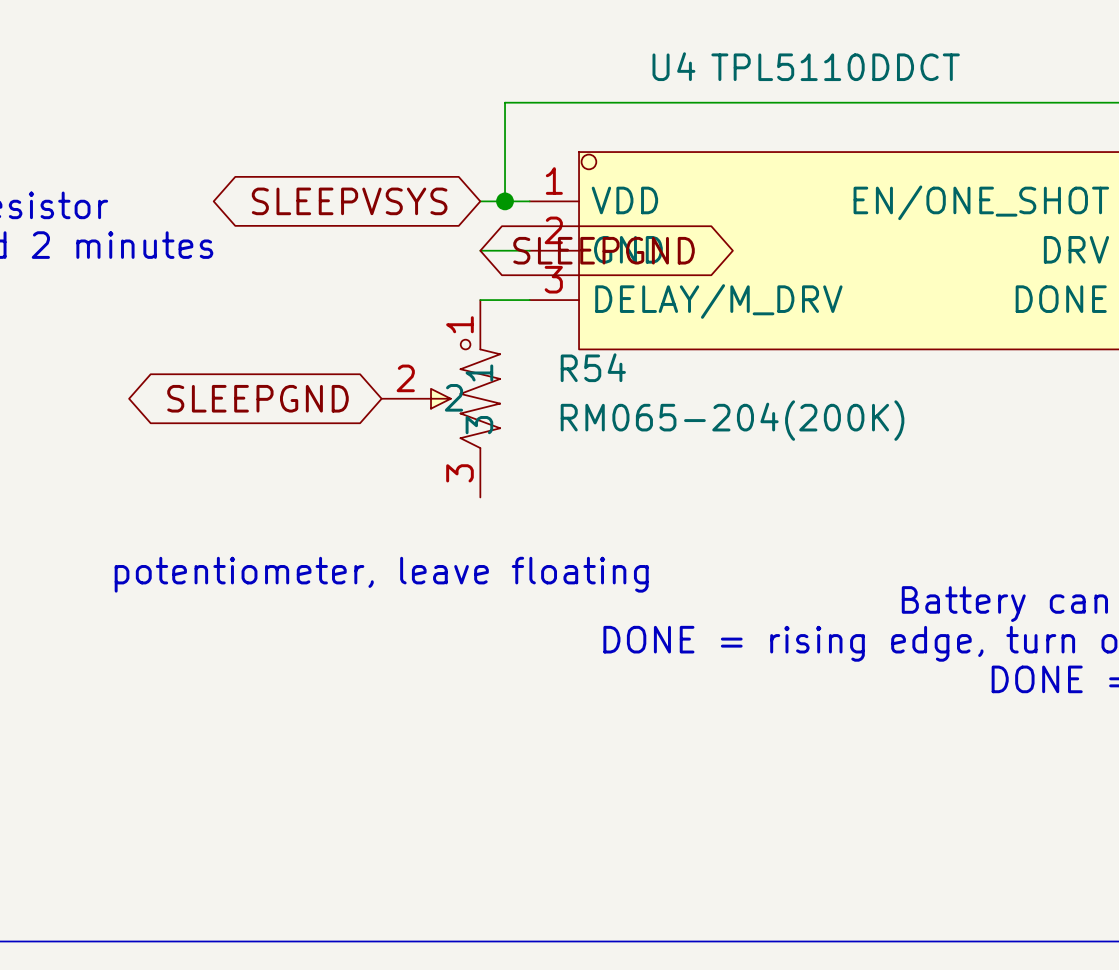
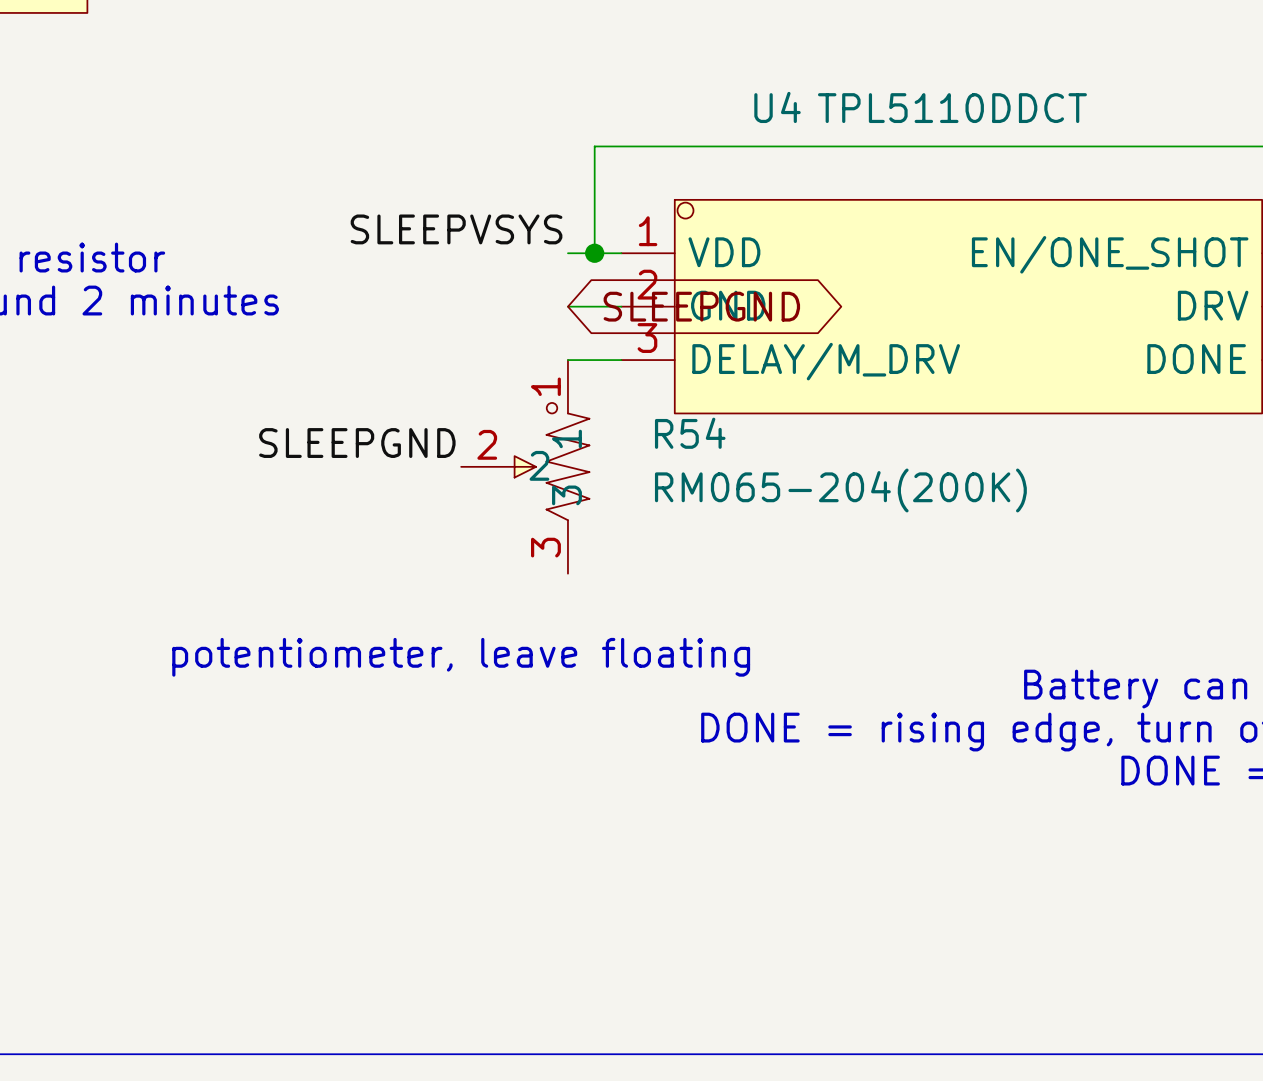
label: none -> SLEEPVSYS (456, 229)
global label: SLEEPVSYS (349, 201) -> none
label: none -> SLEEPGND (357, 443)
global label: SLEEPGND (257, 398) -> none

